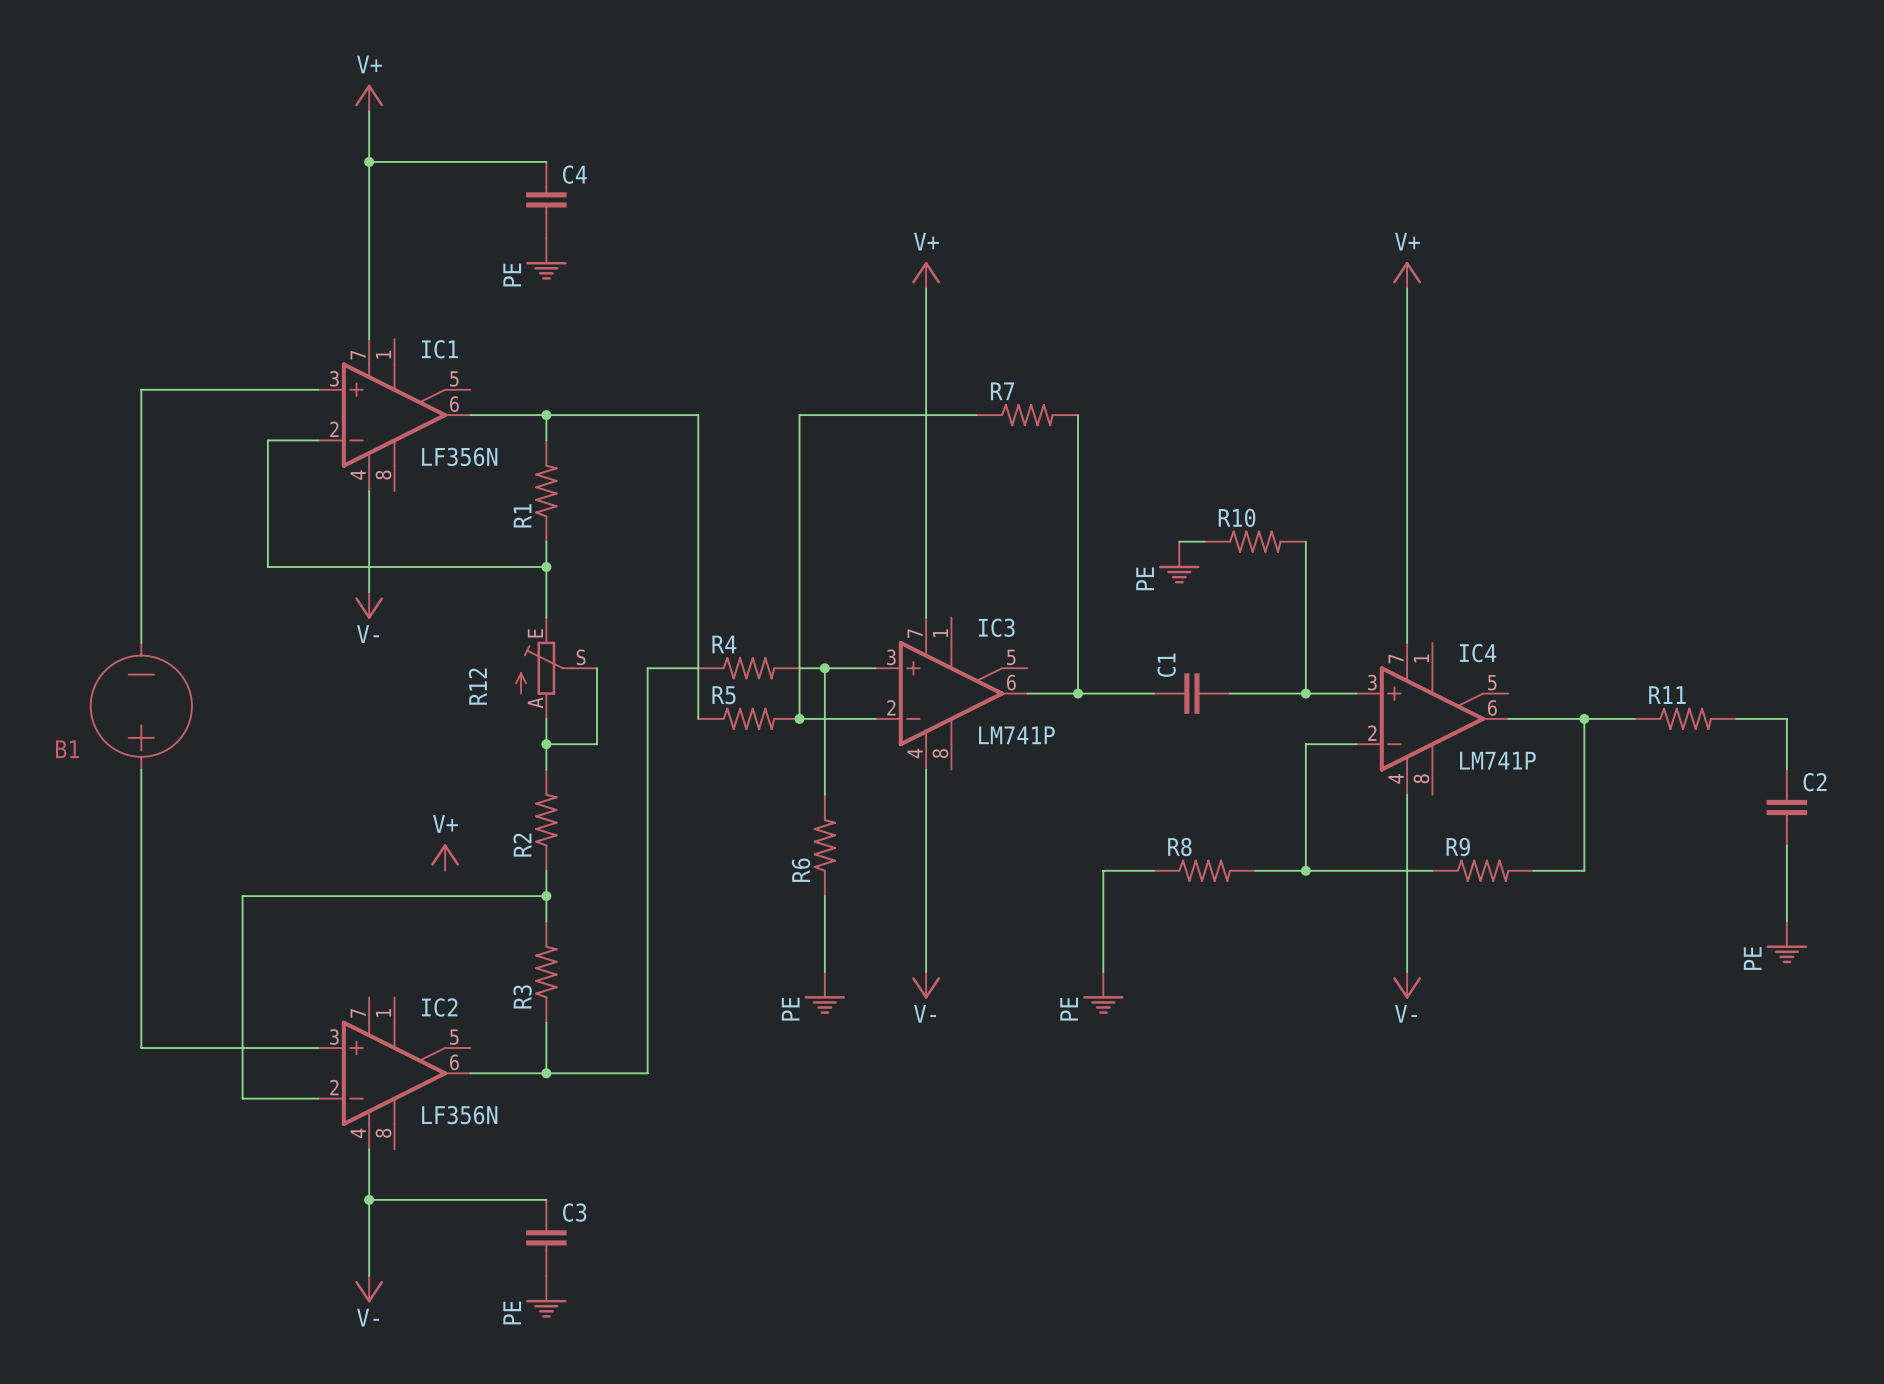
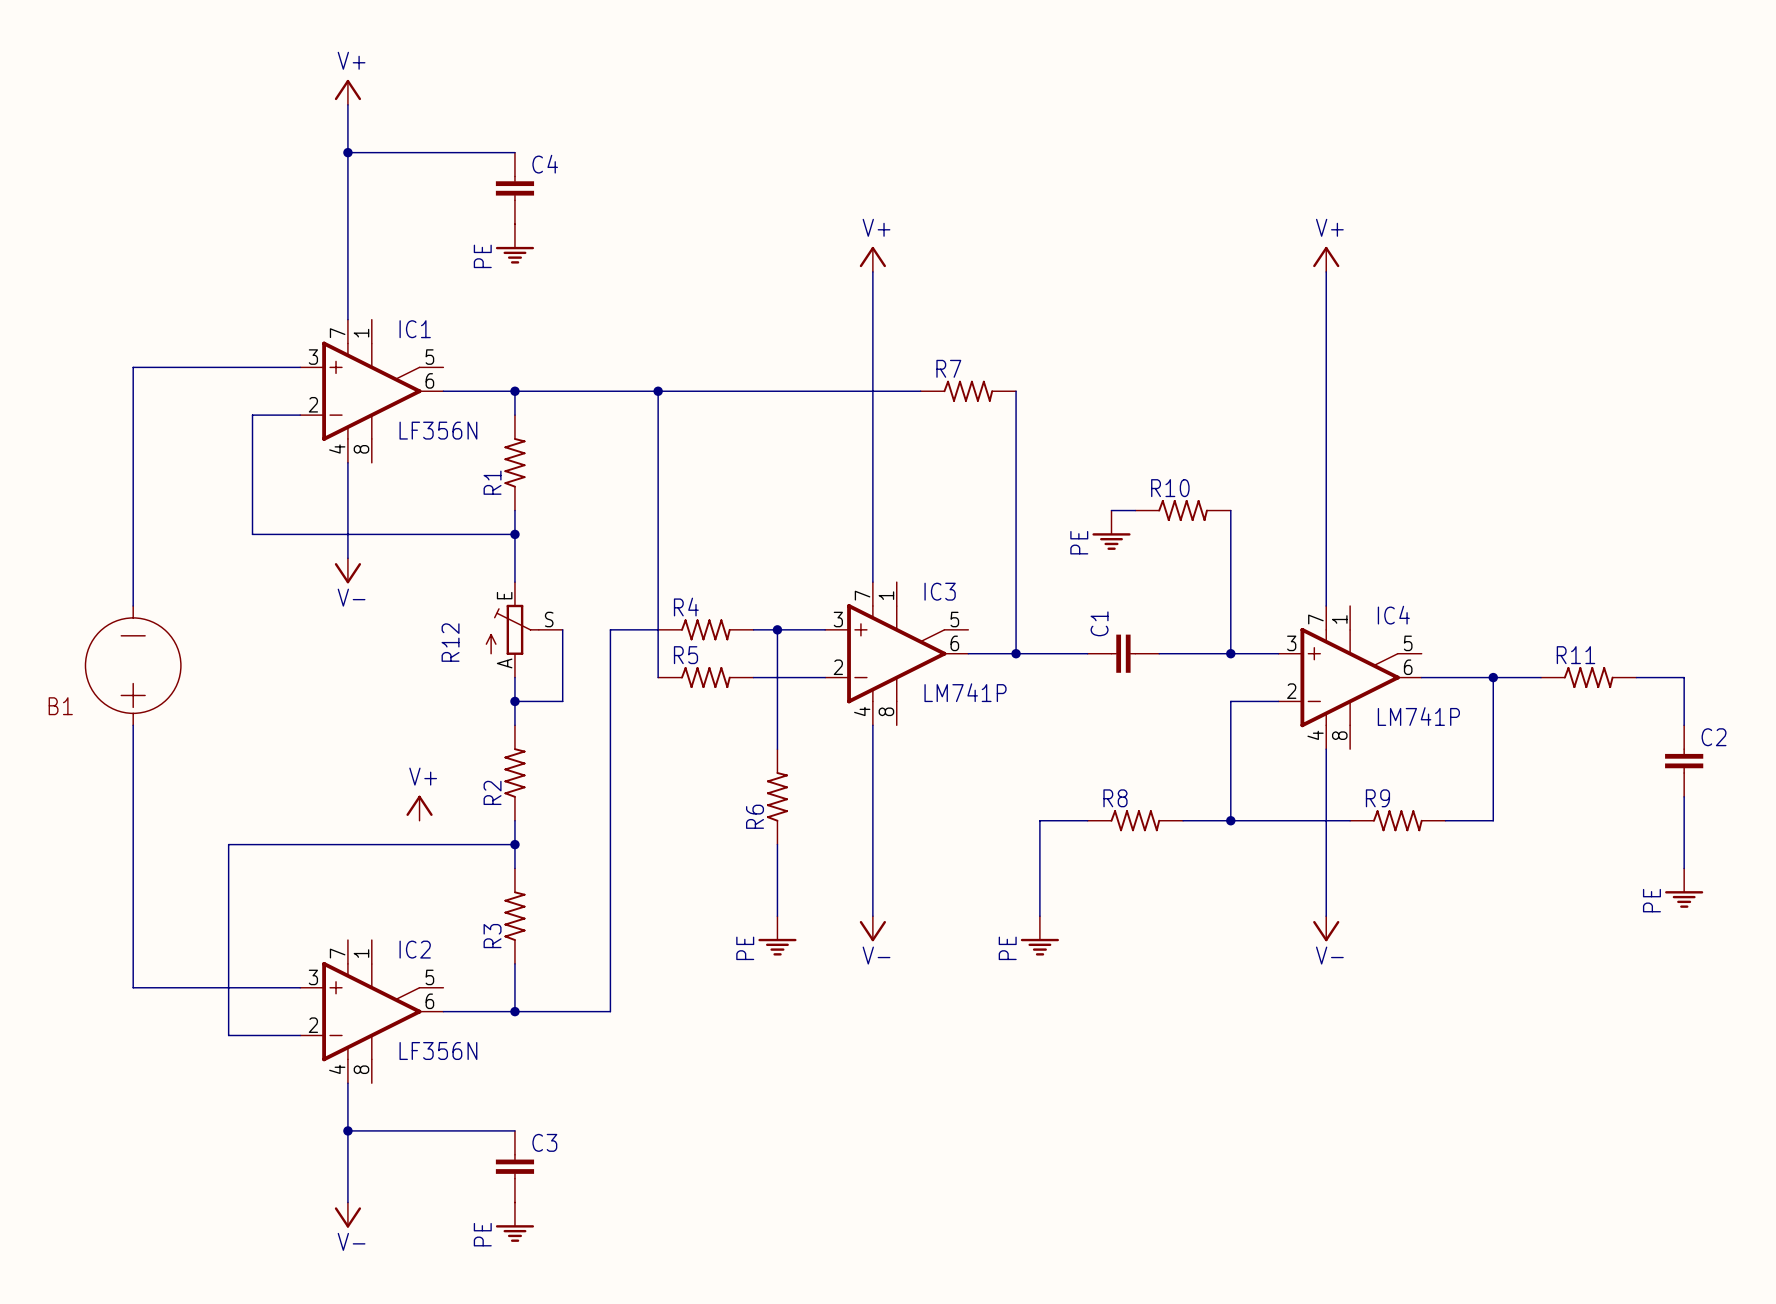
junction: none -> (658, 391)
wire: (799, 415) (799, 718) -> (753, 391) (658, 391)
junction: (799, 718) -> none

